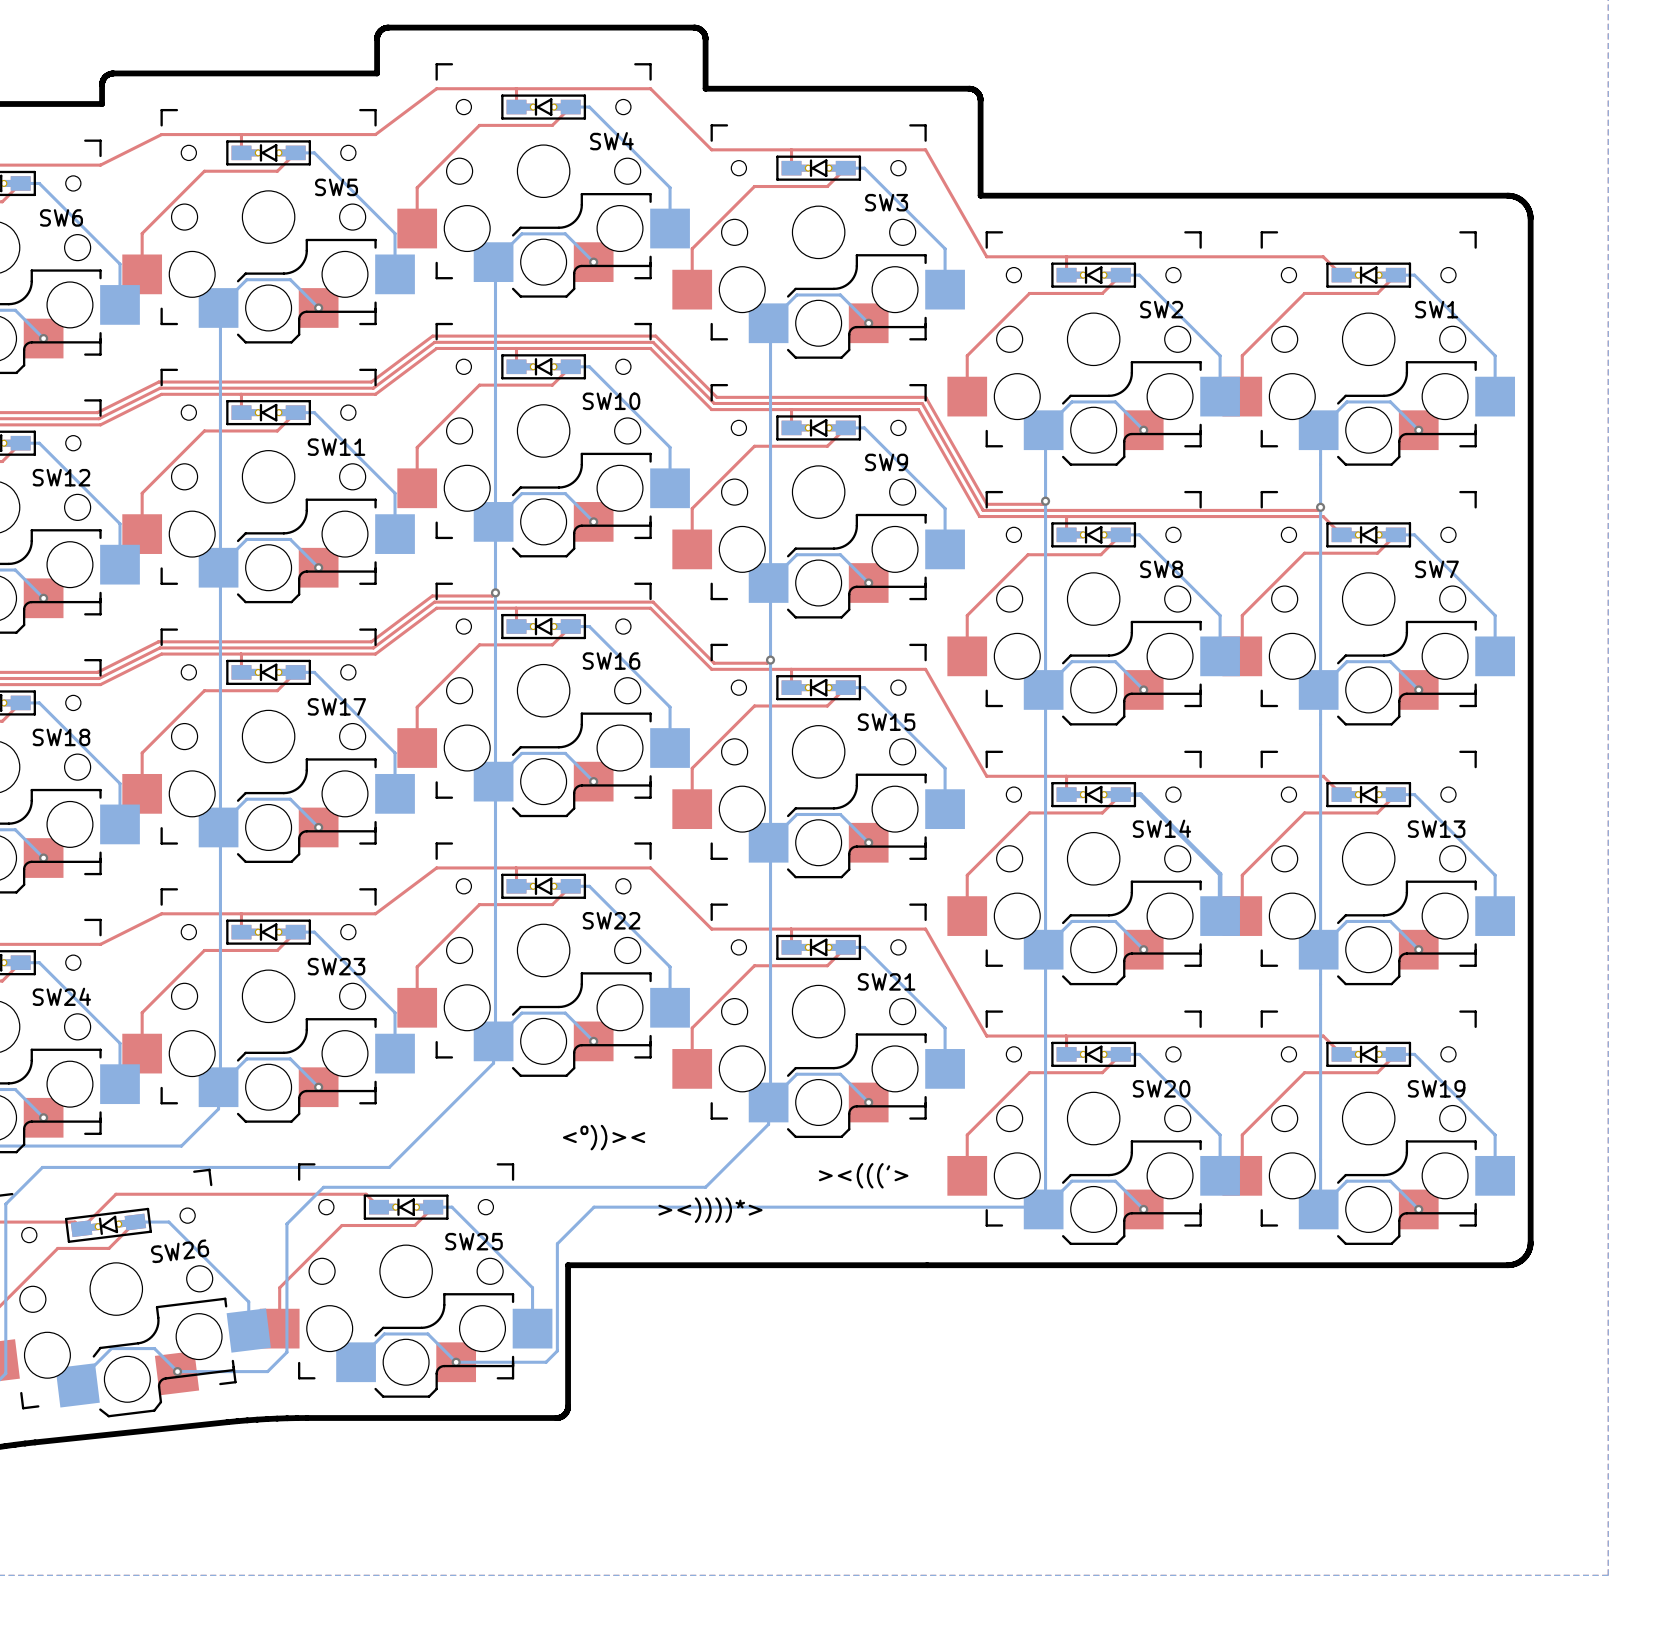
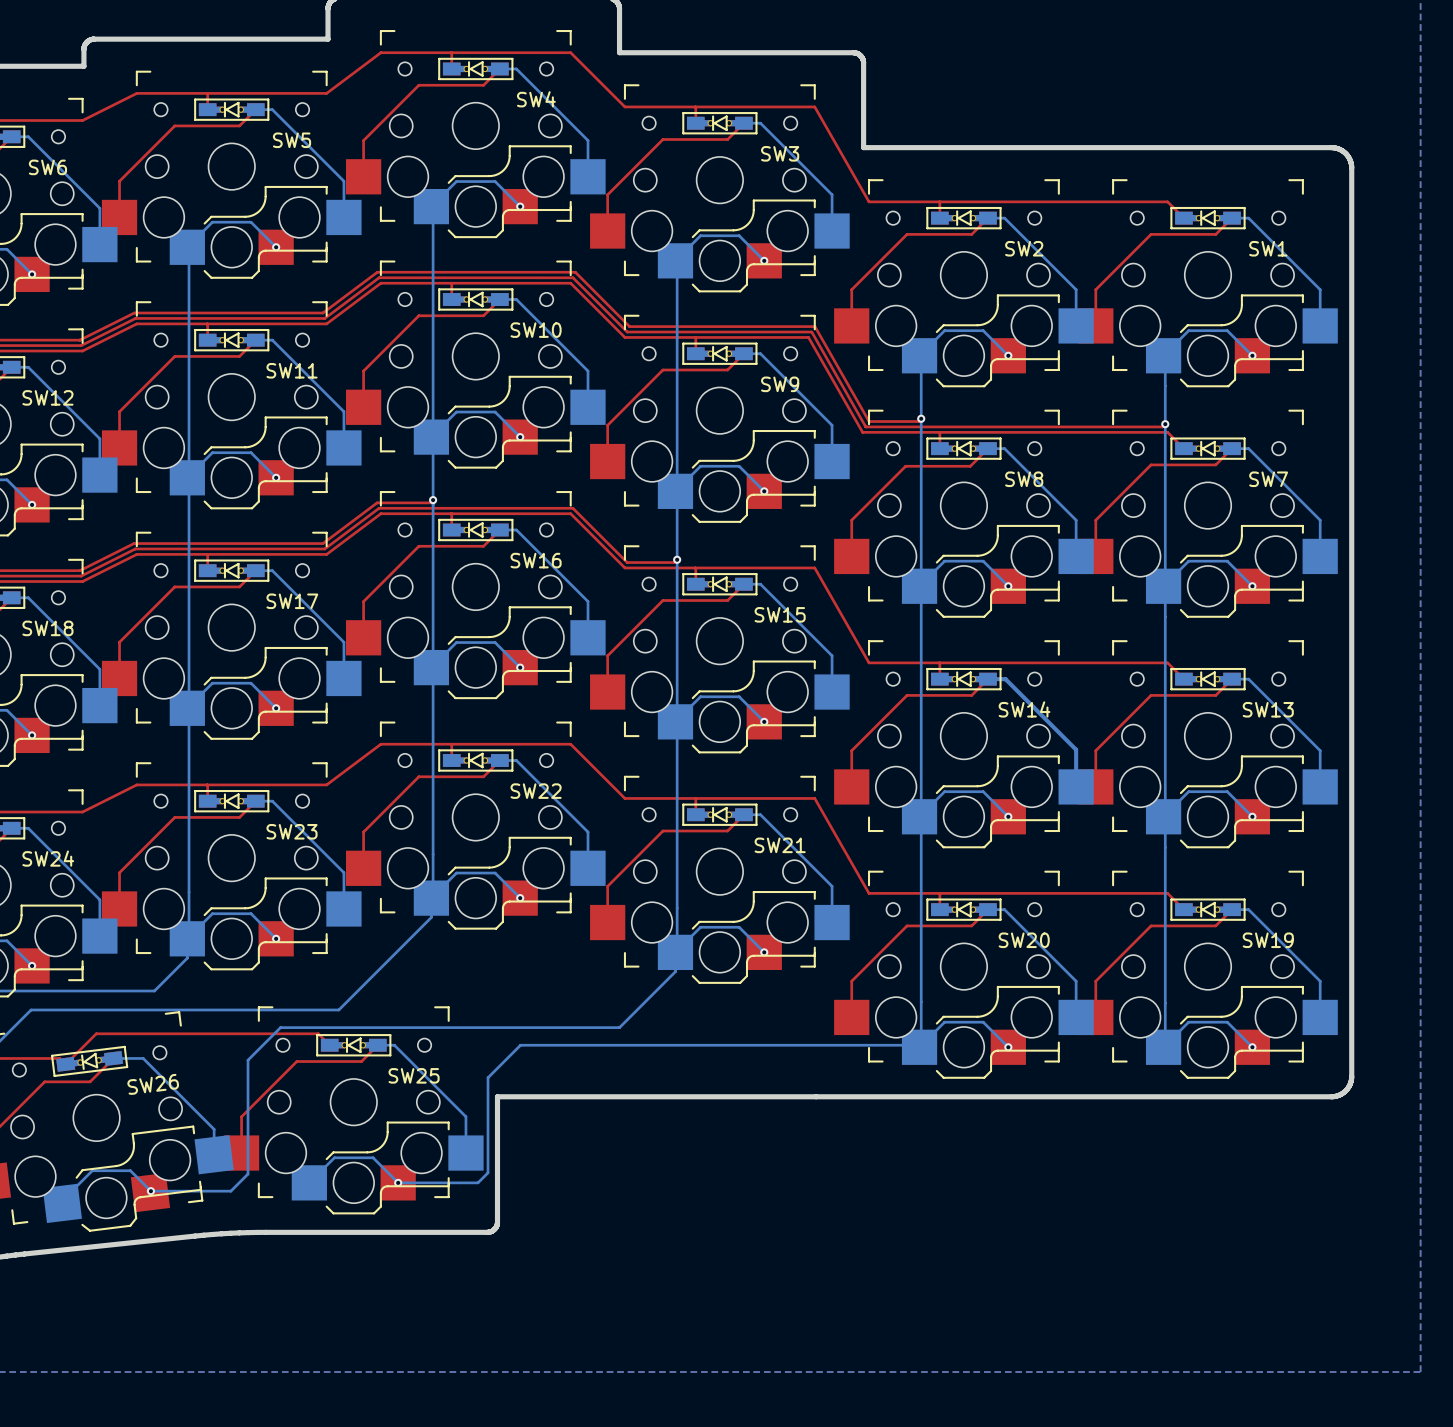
text: <º))>< (604, 1137) -> none
text: ><((('> (863, 1175) -> none
text: ><))))*> (710, 1210) -> none

